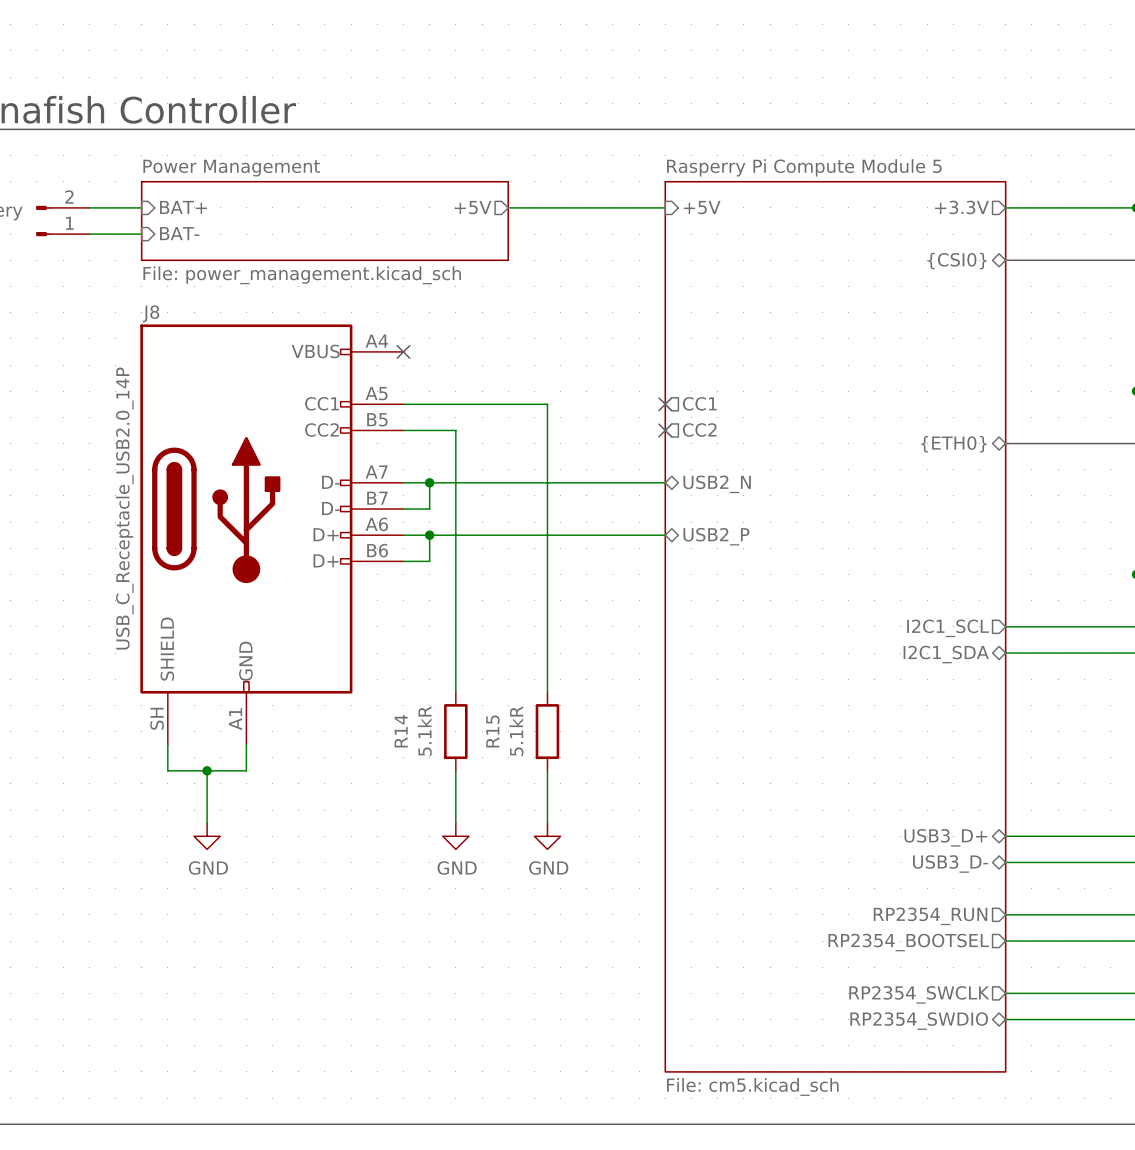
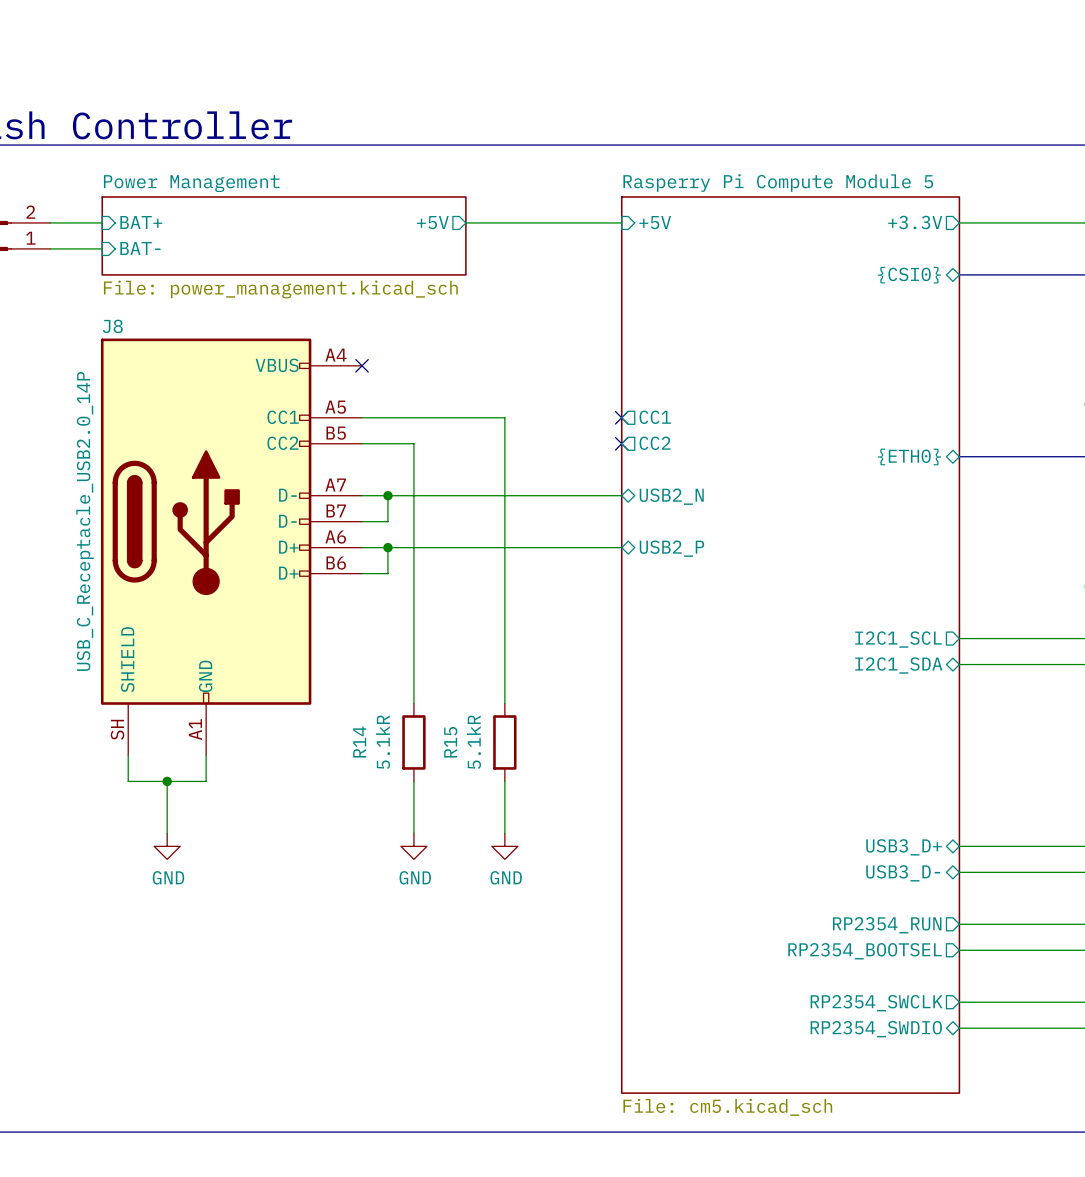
sheet Rasperry Pi Compute Module 5 shape: [664, 180, 1007, 1073] -> [620, 196, 961, 1094]

